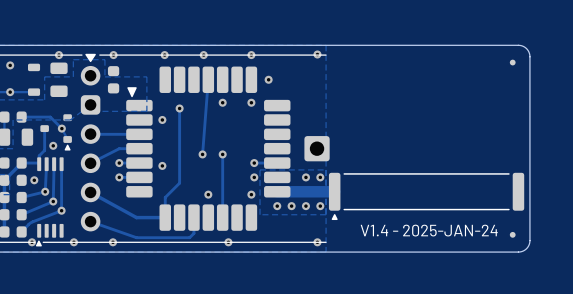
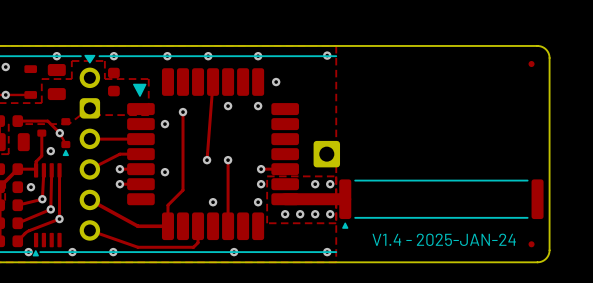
part footprint: [126, 66, 291, 231] -> [127, 68, 299, 241]

